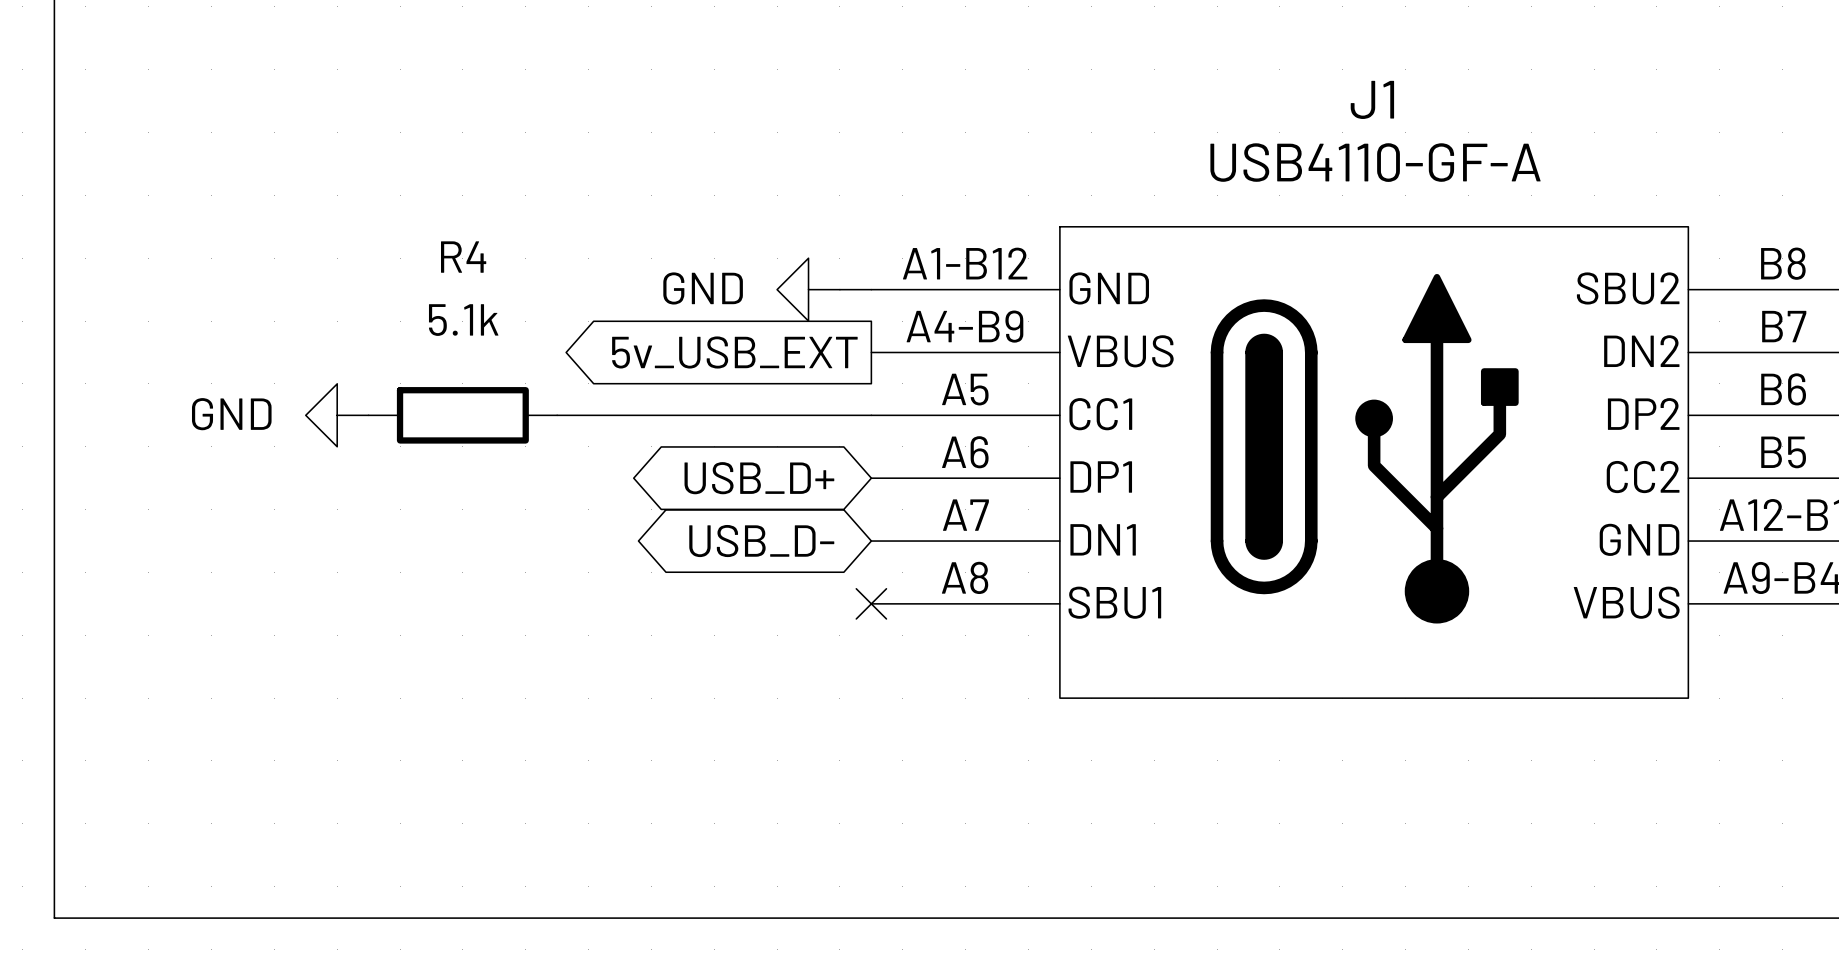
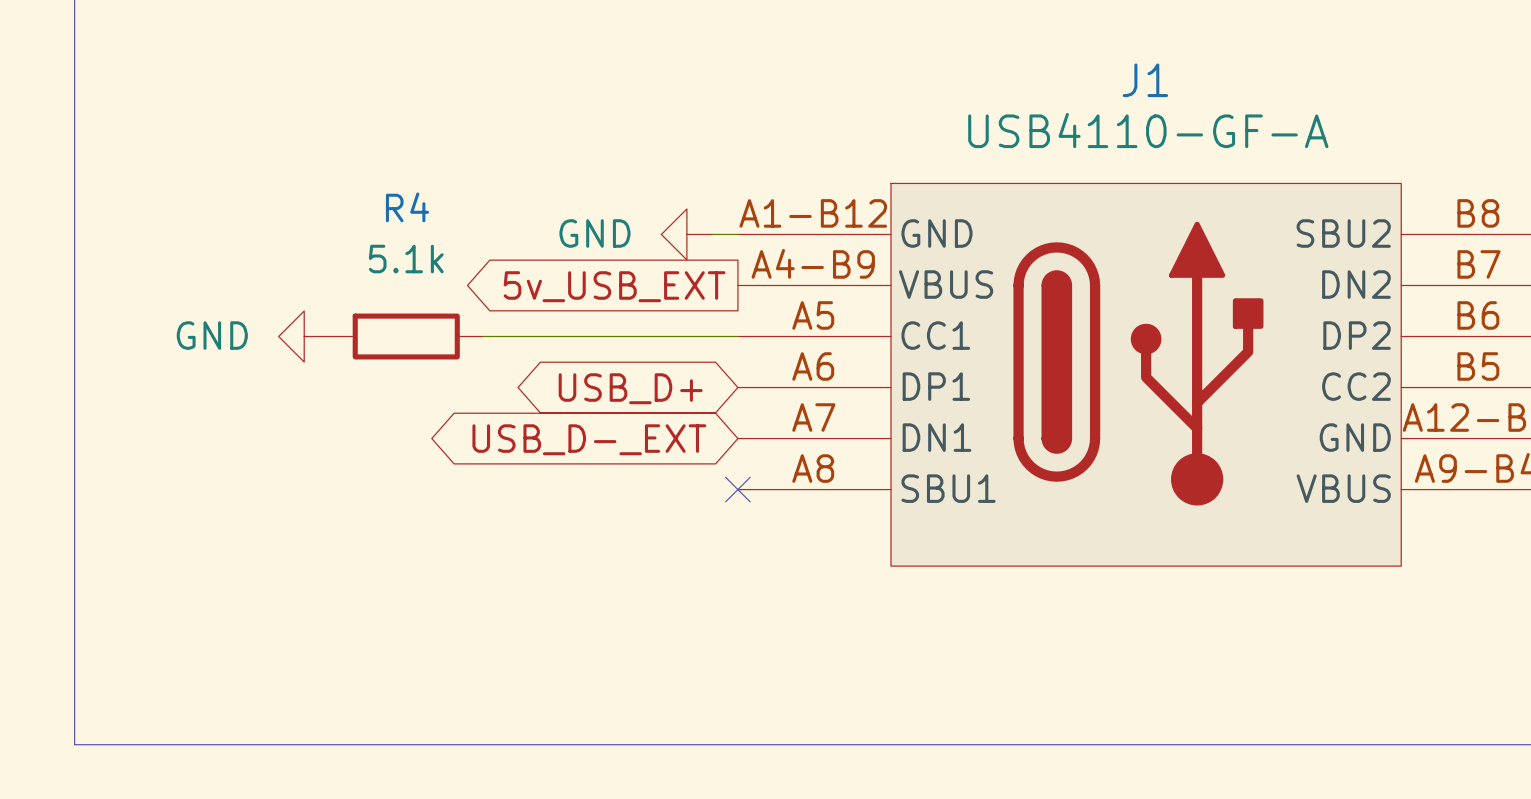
global label: USB_D- (761, 541) -> USB_D-_EXT (589, 439)

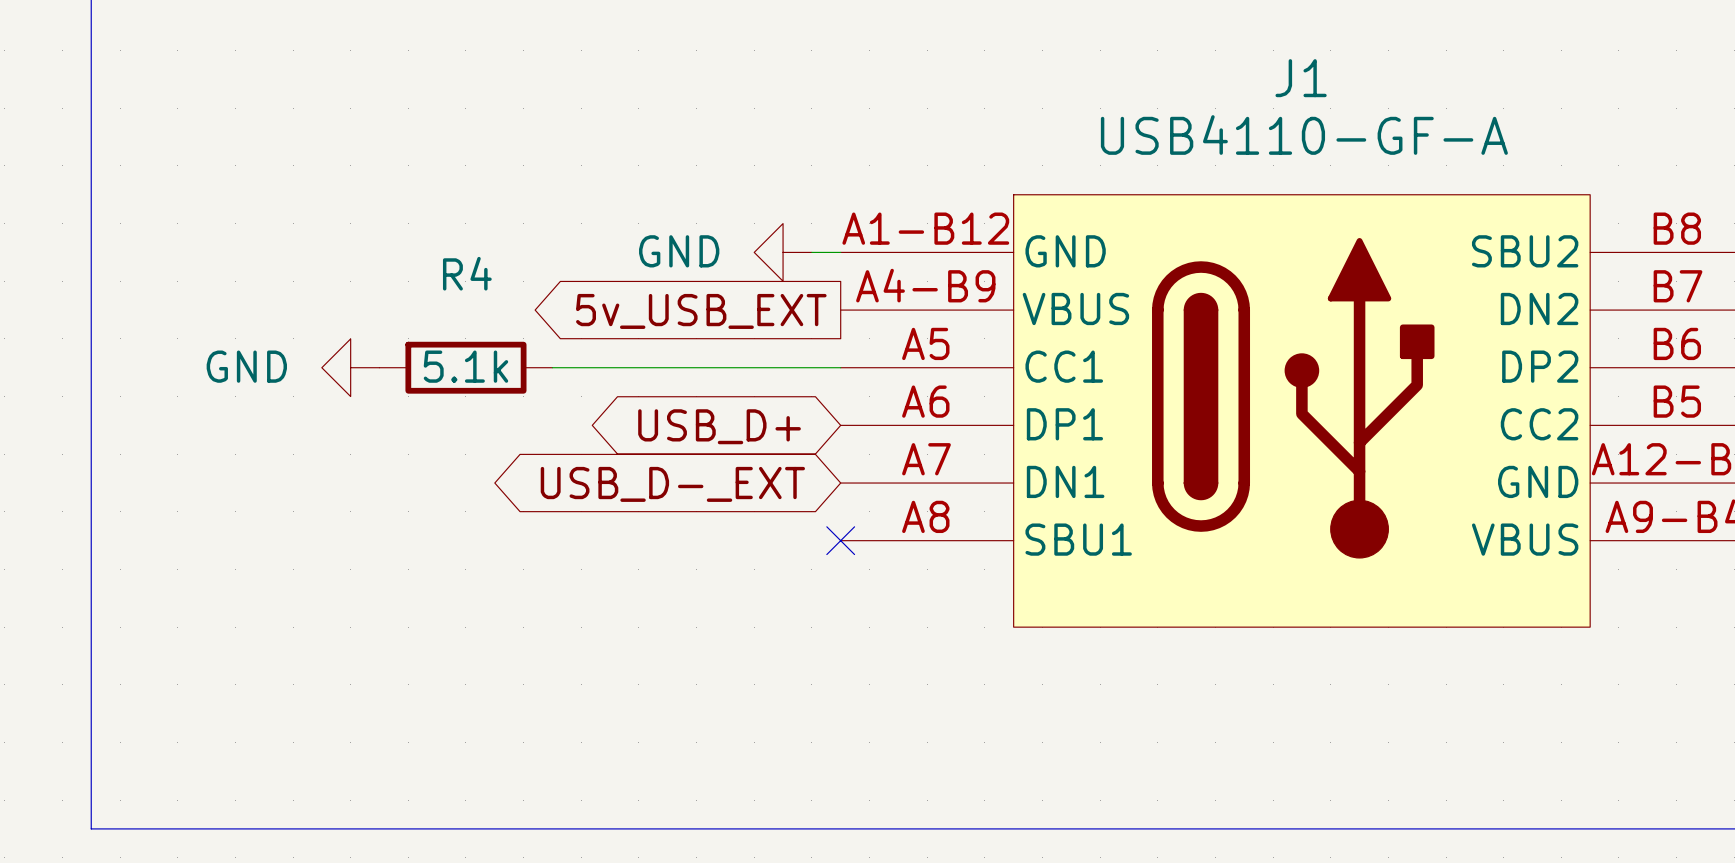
R4 name position: R4 (407, 207) -> R4 (467, 273)
R4 value position: 5.1k (406, 259) -> 5.1k (465, 366)

